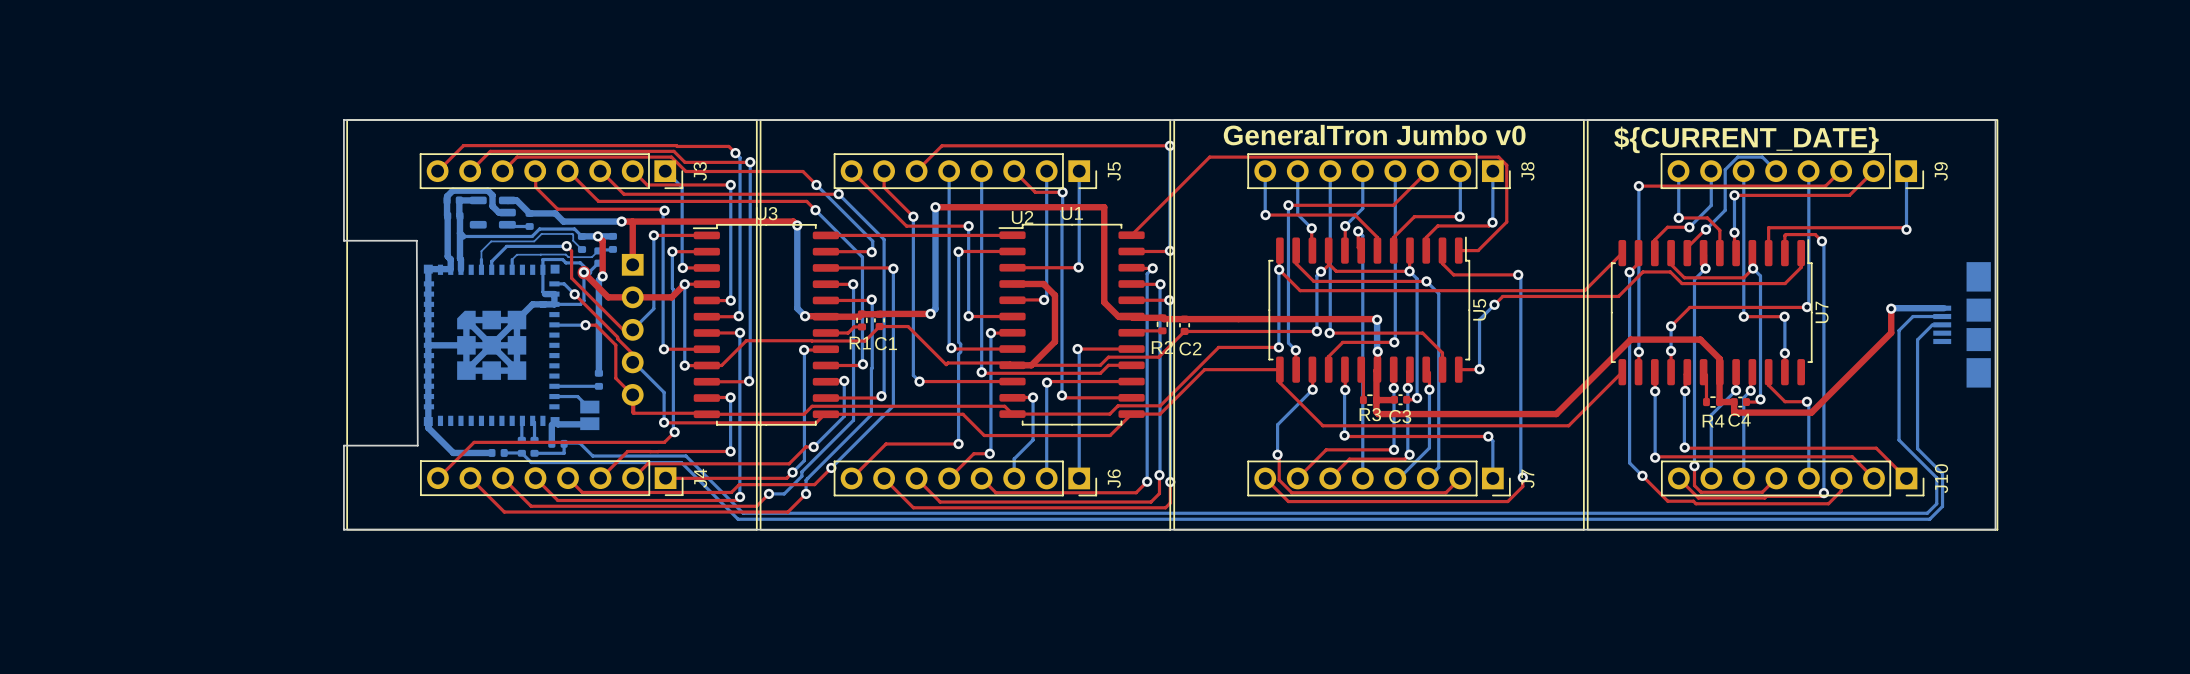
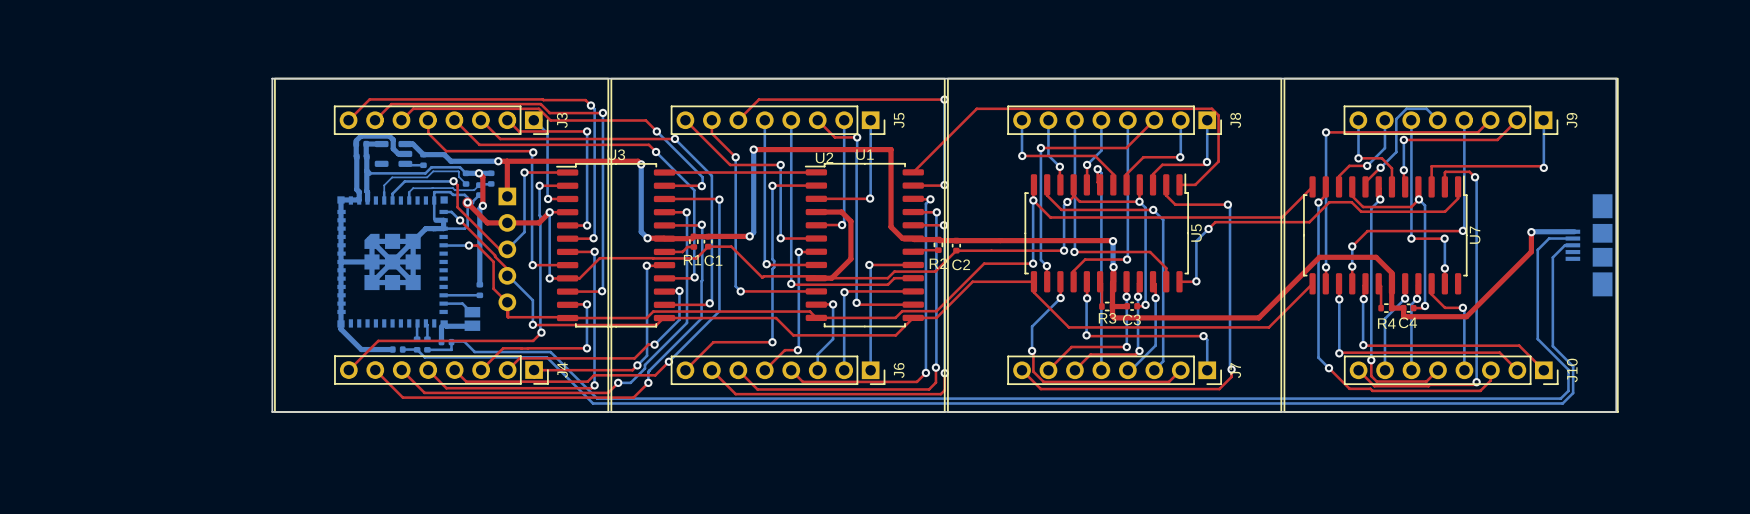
board edge: (343, 120) (343, 240) (416, 240) (417, 445) (343, 445) (343, 529) -> (272, 78) (272, 411)
text: GeneralTron Jumbo v0 (1374, 135) -> none
text: ${CURRENT_DATE} (1746, 139) -> none

